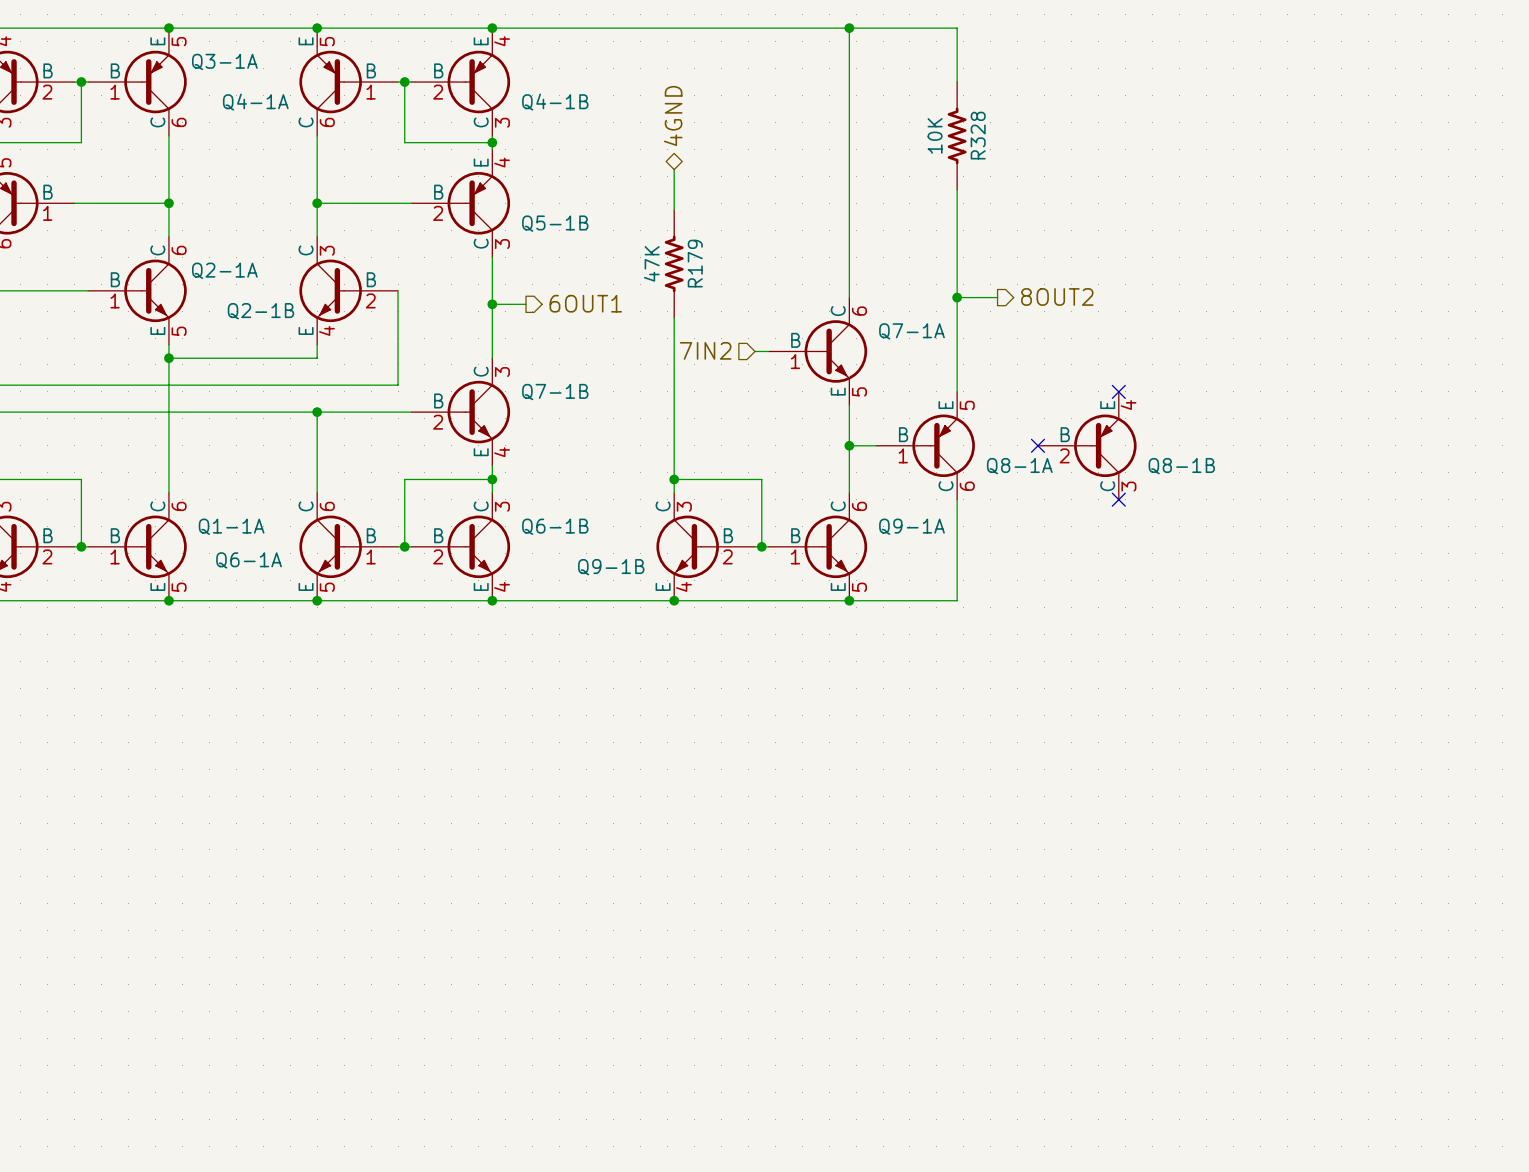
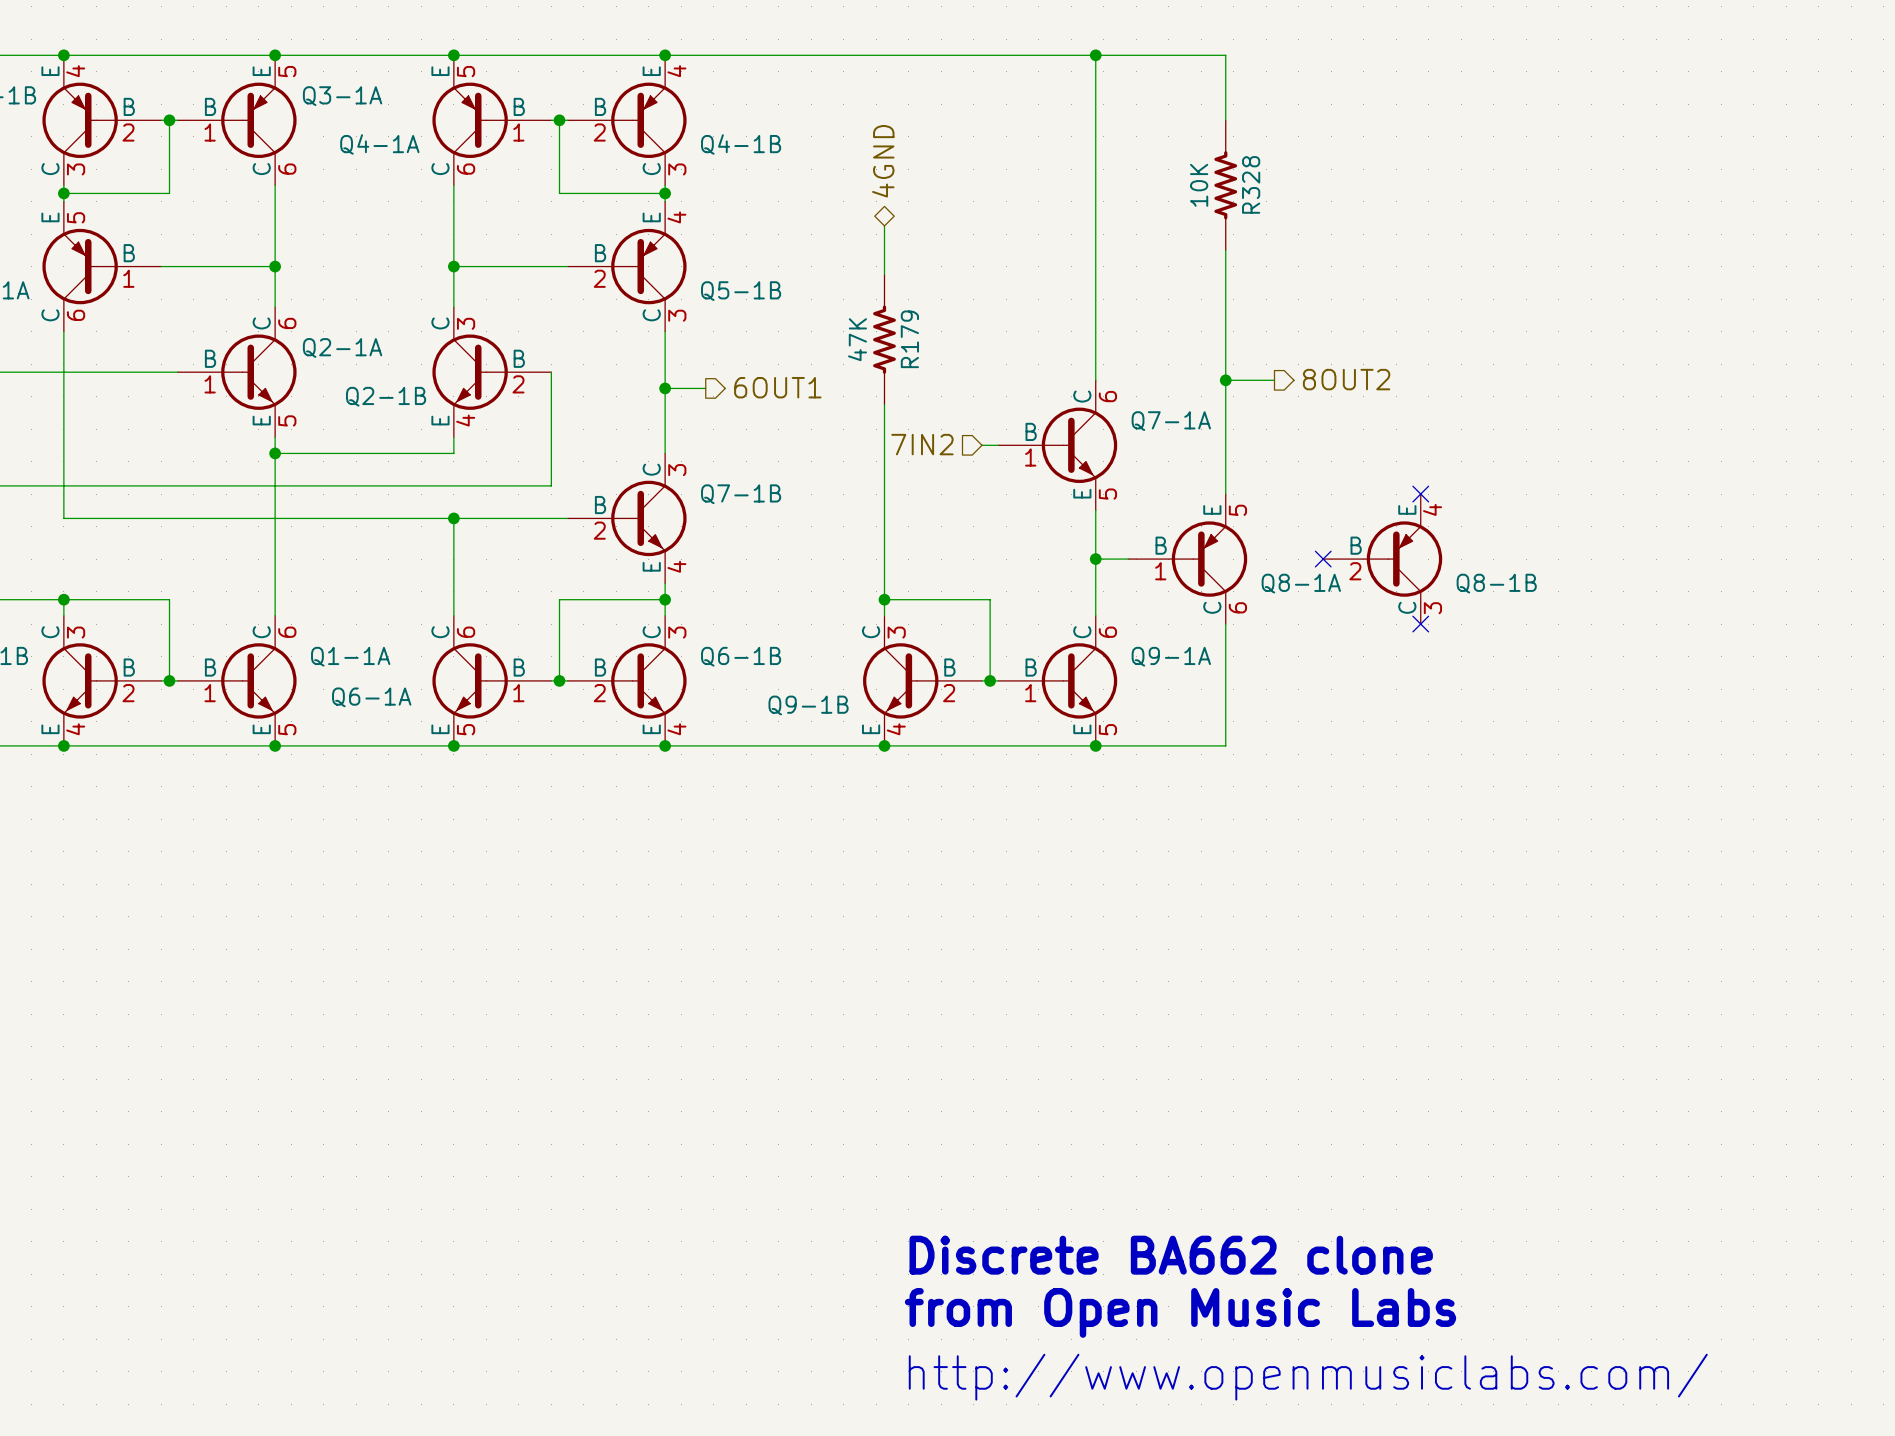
text: none -> Discrete BA662 clone (1171, 1255)
text: none -> from Open Music Labs (1180, 1312)
text: none -> http://www.openmusiclabs.com/ (1308, 1377)

